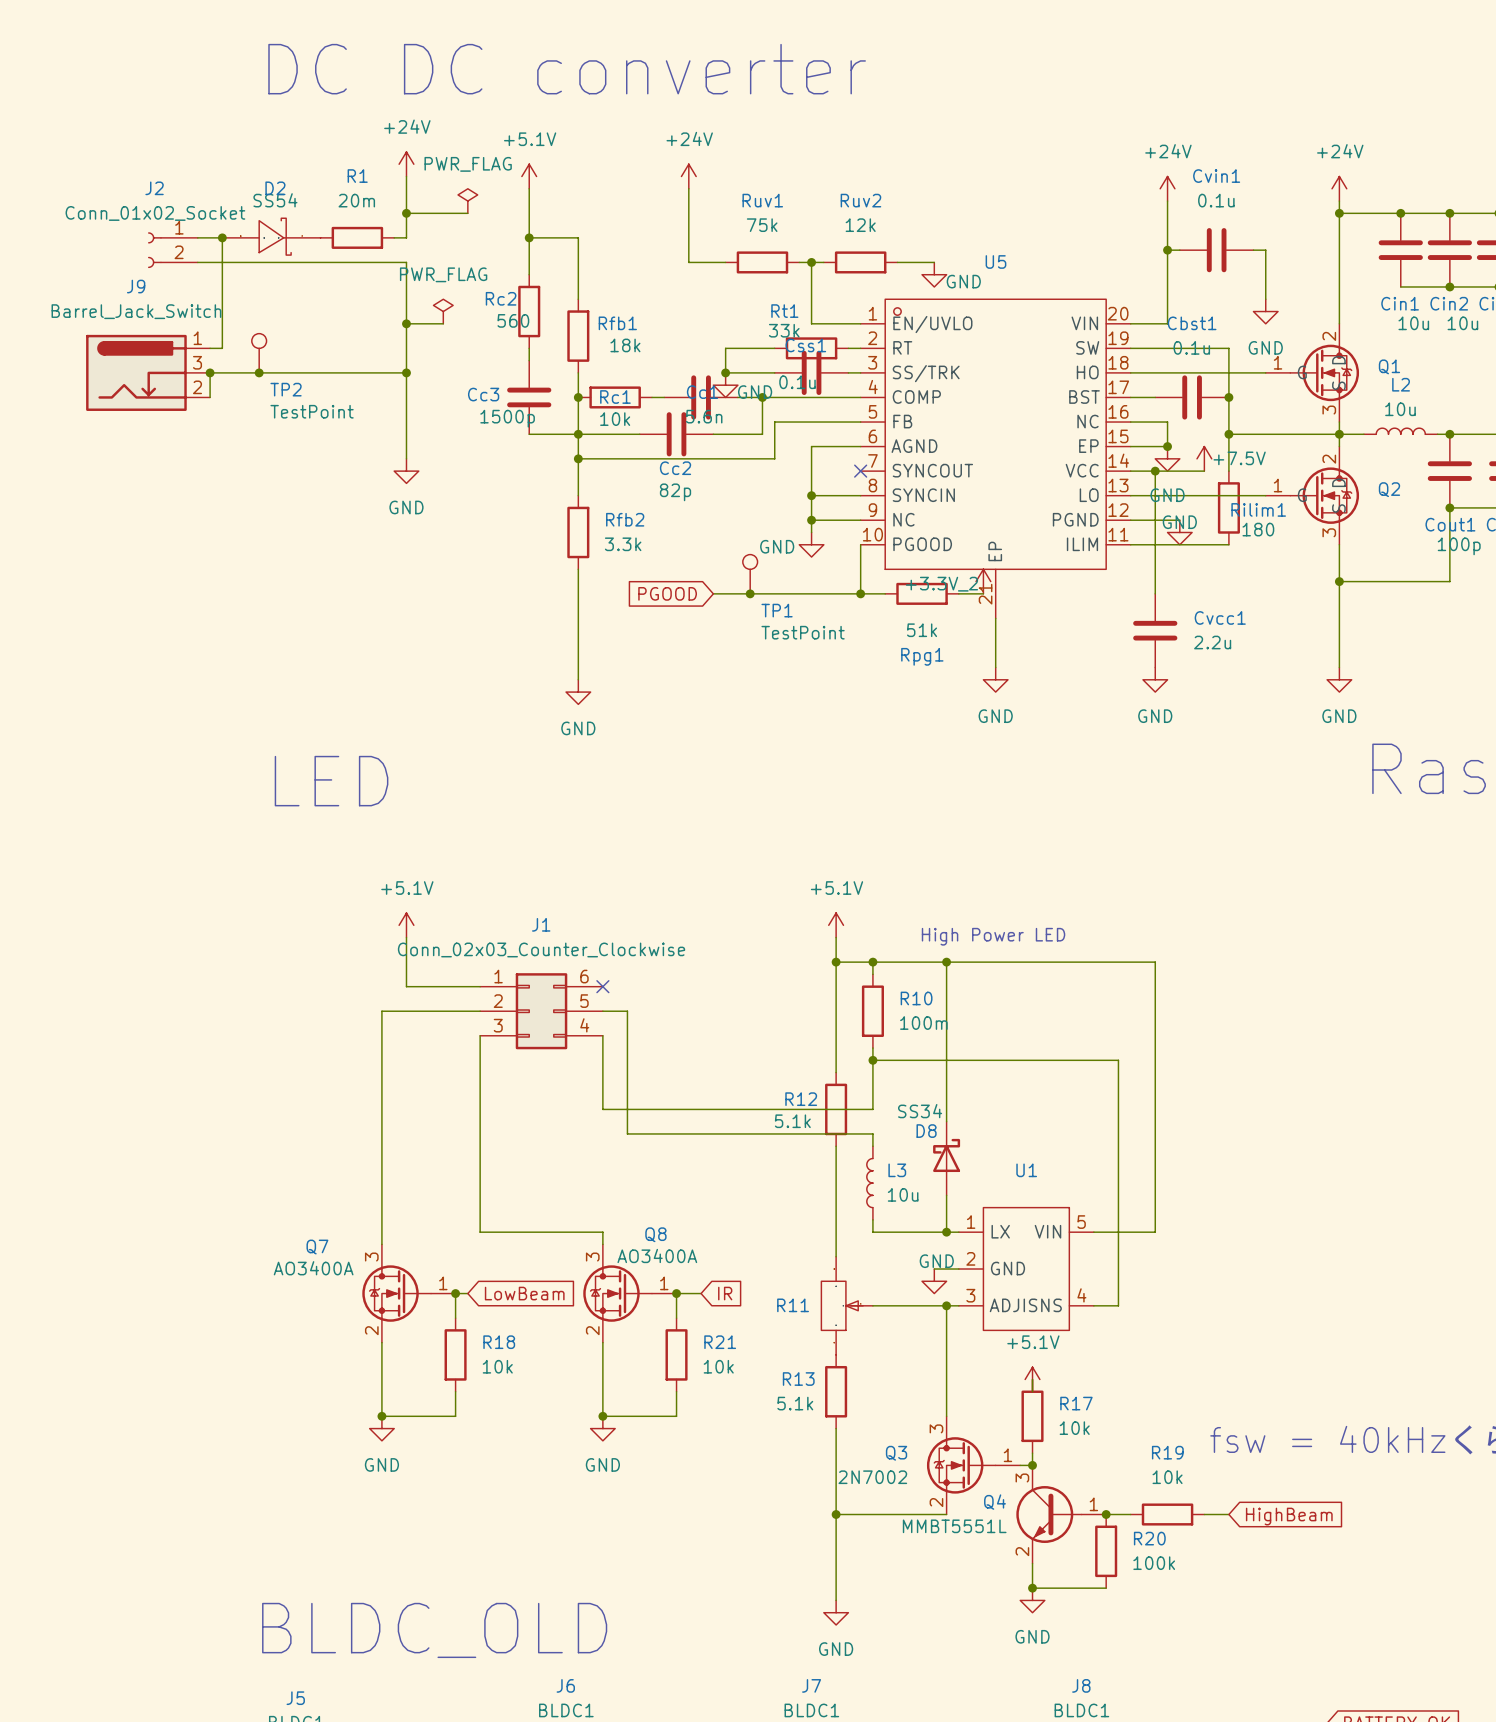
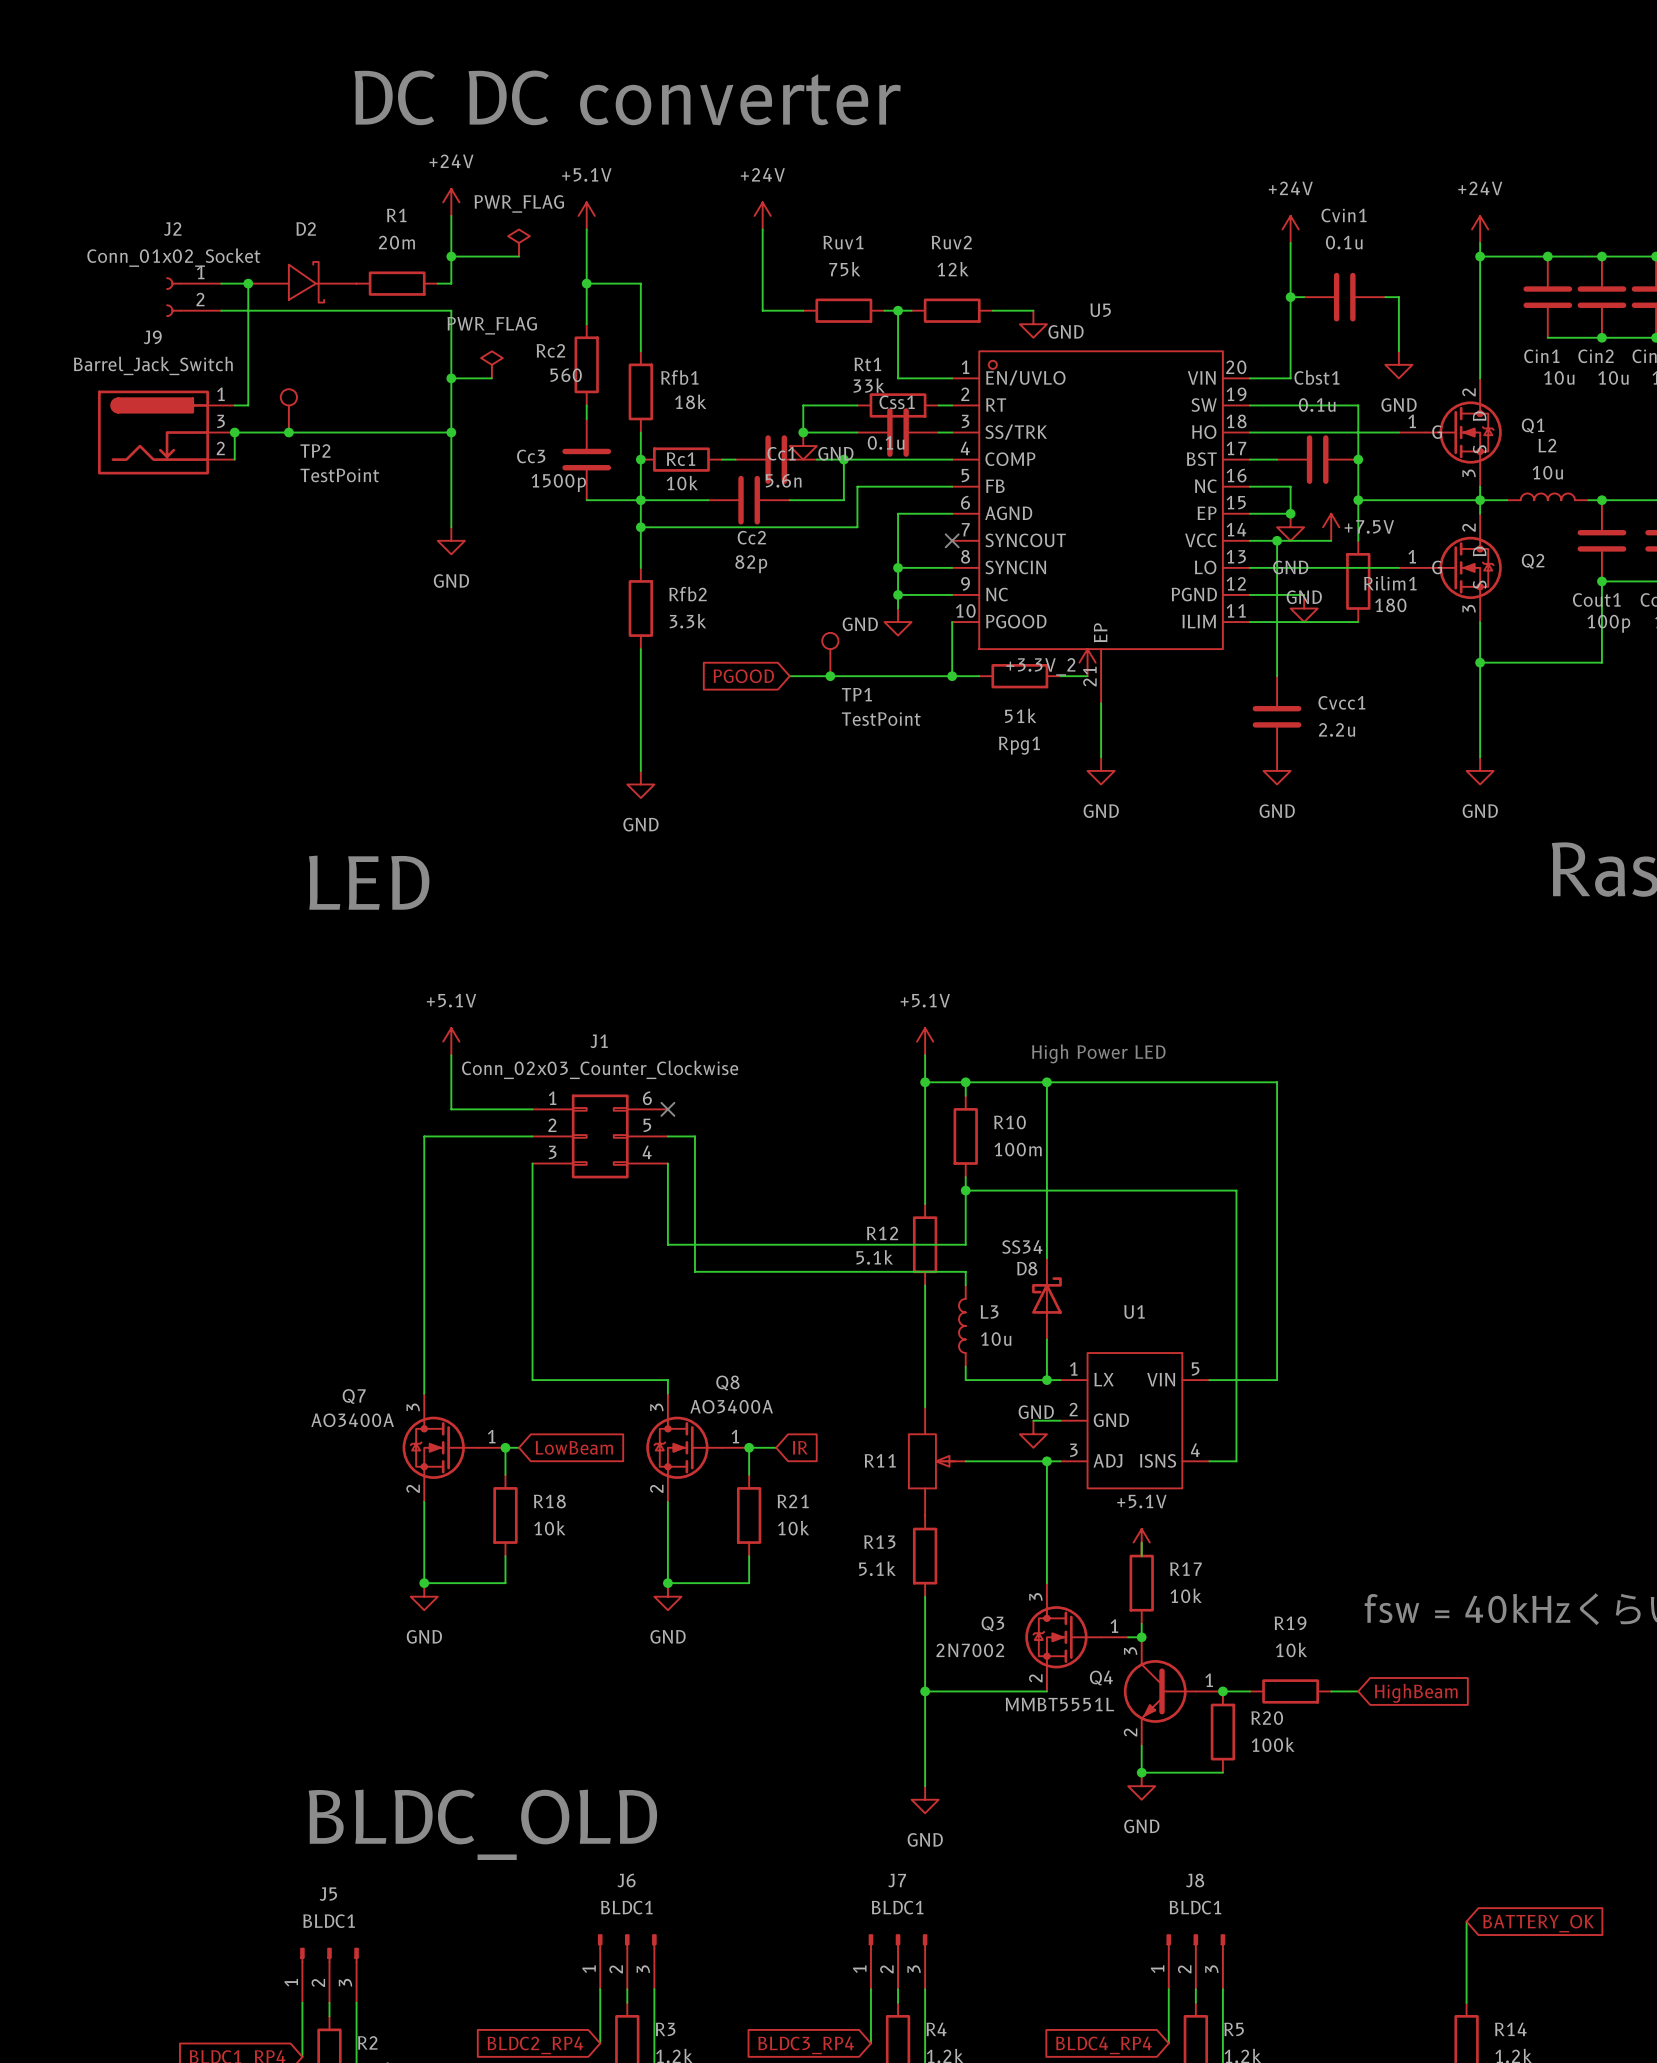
D2 value: SS54 (275, 200) -> none

